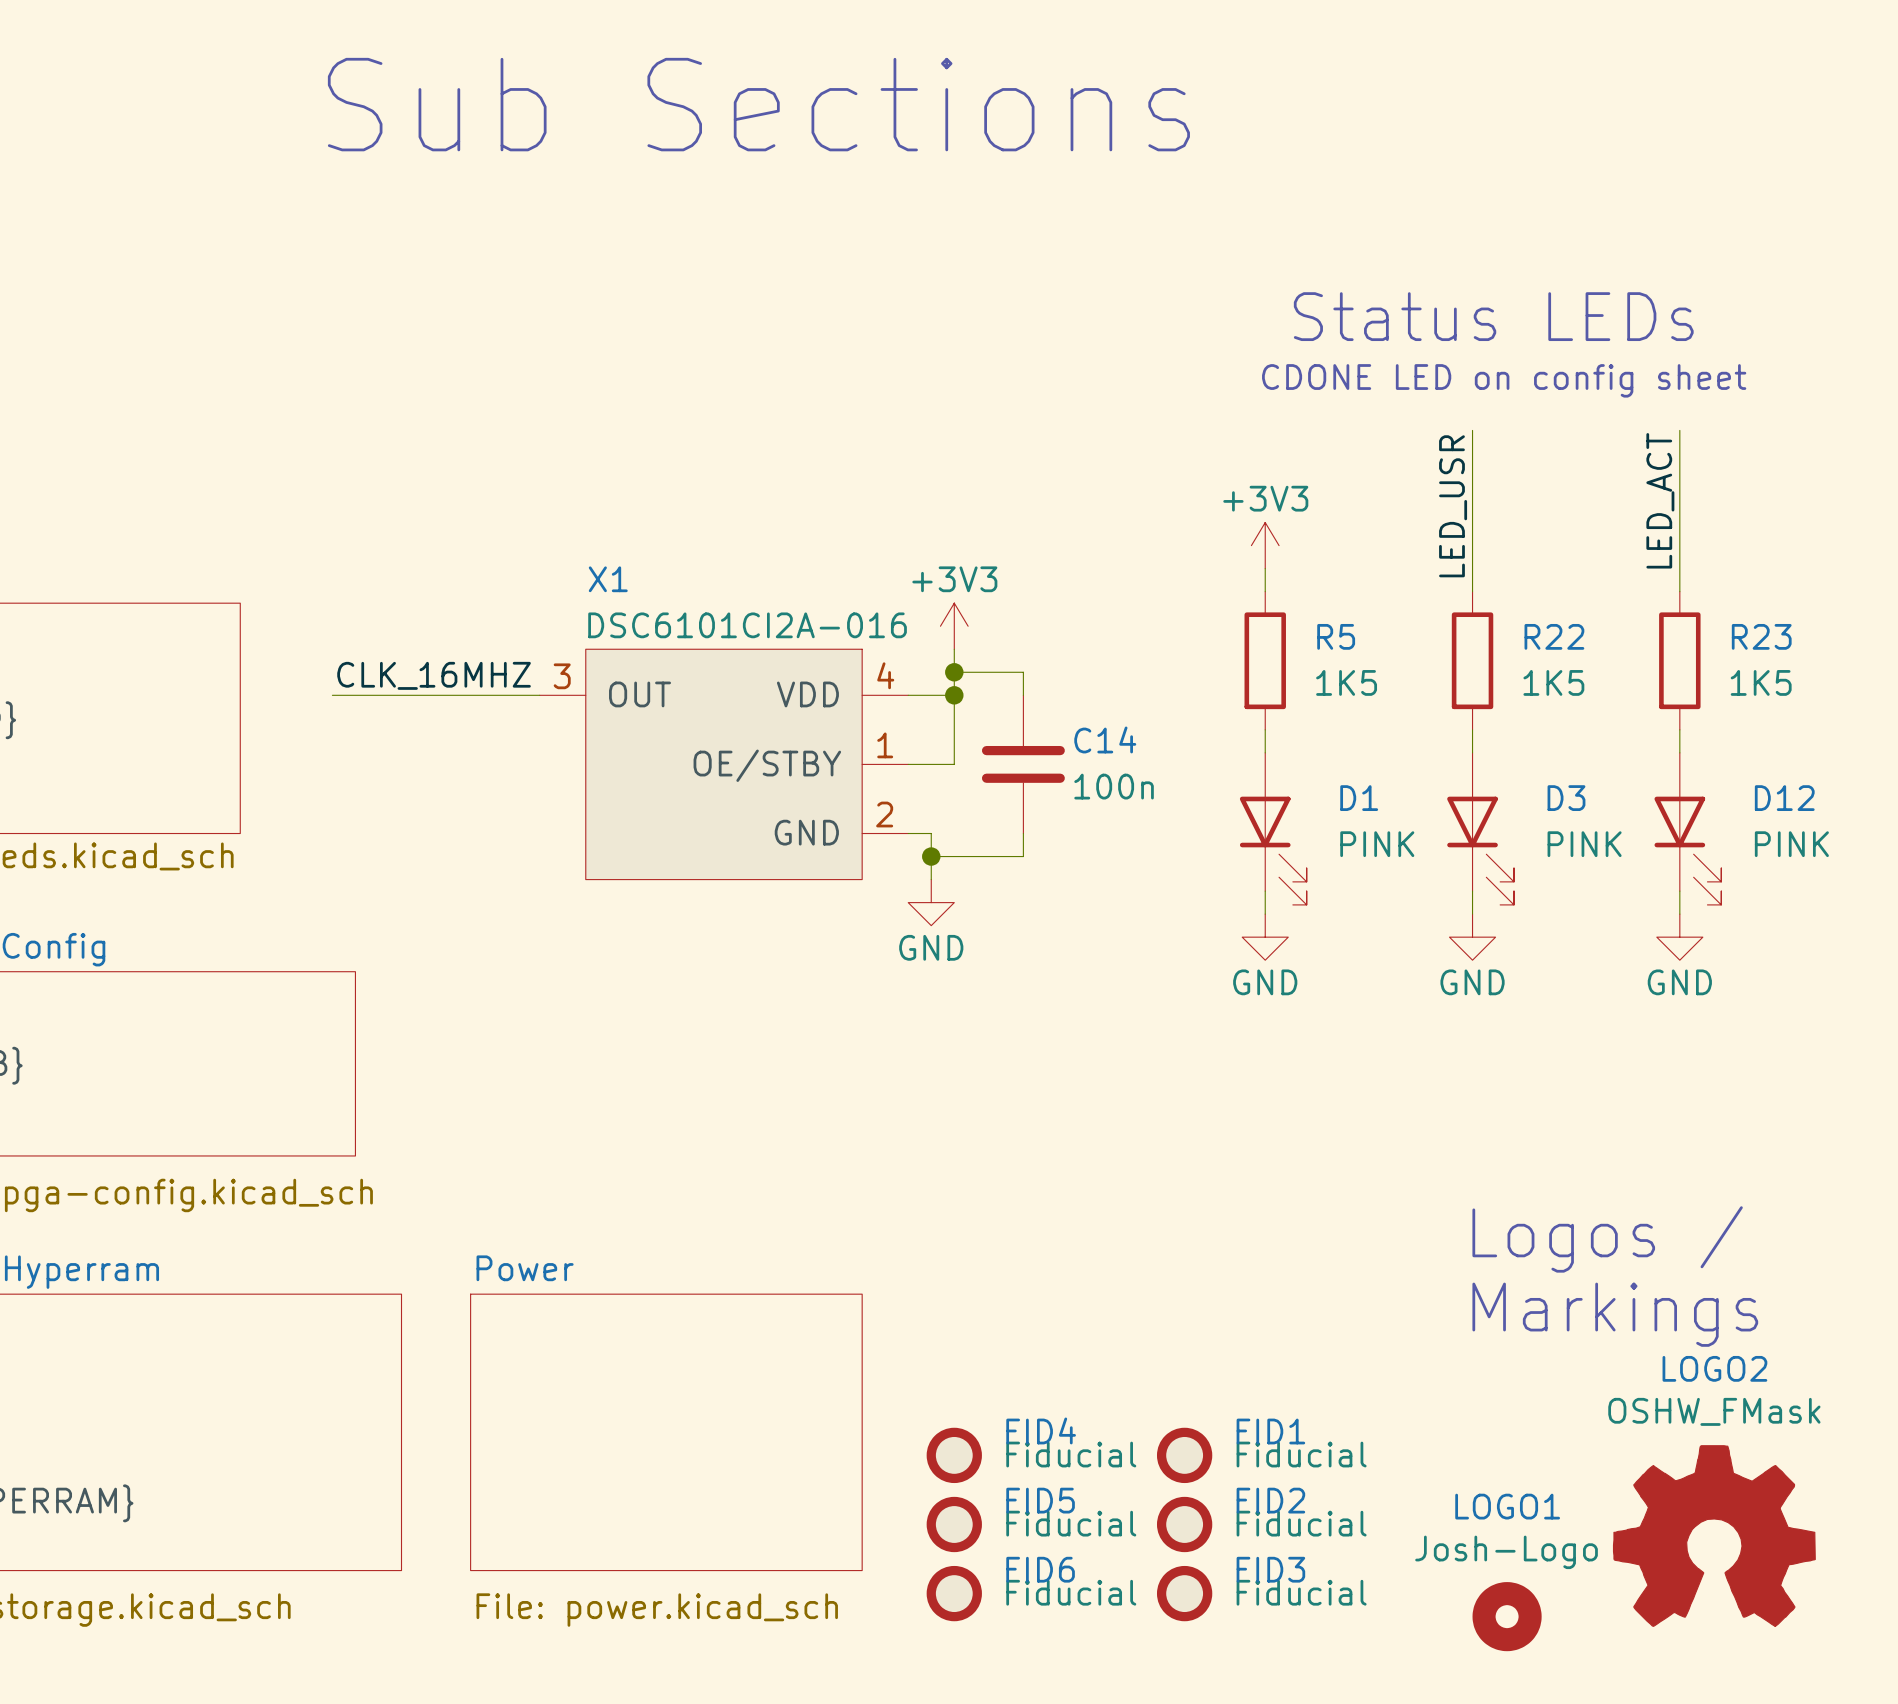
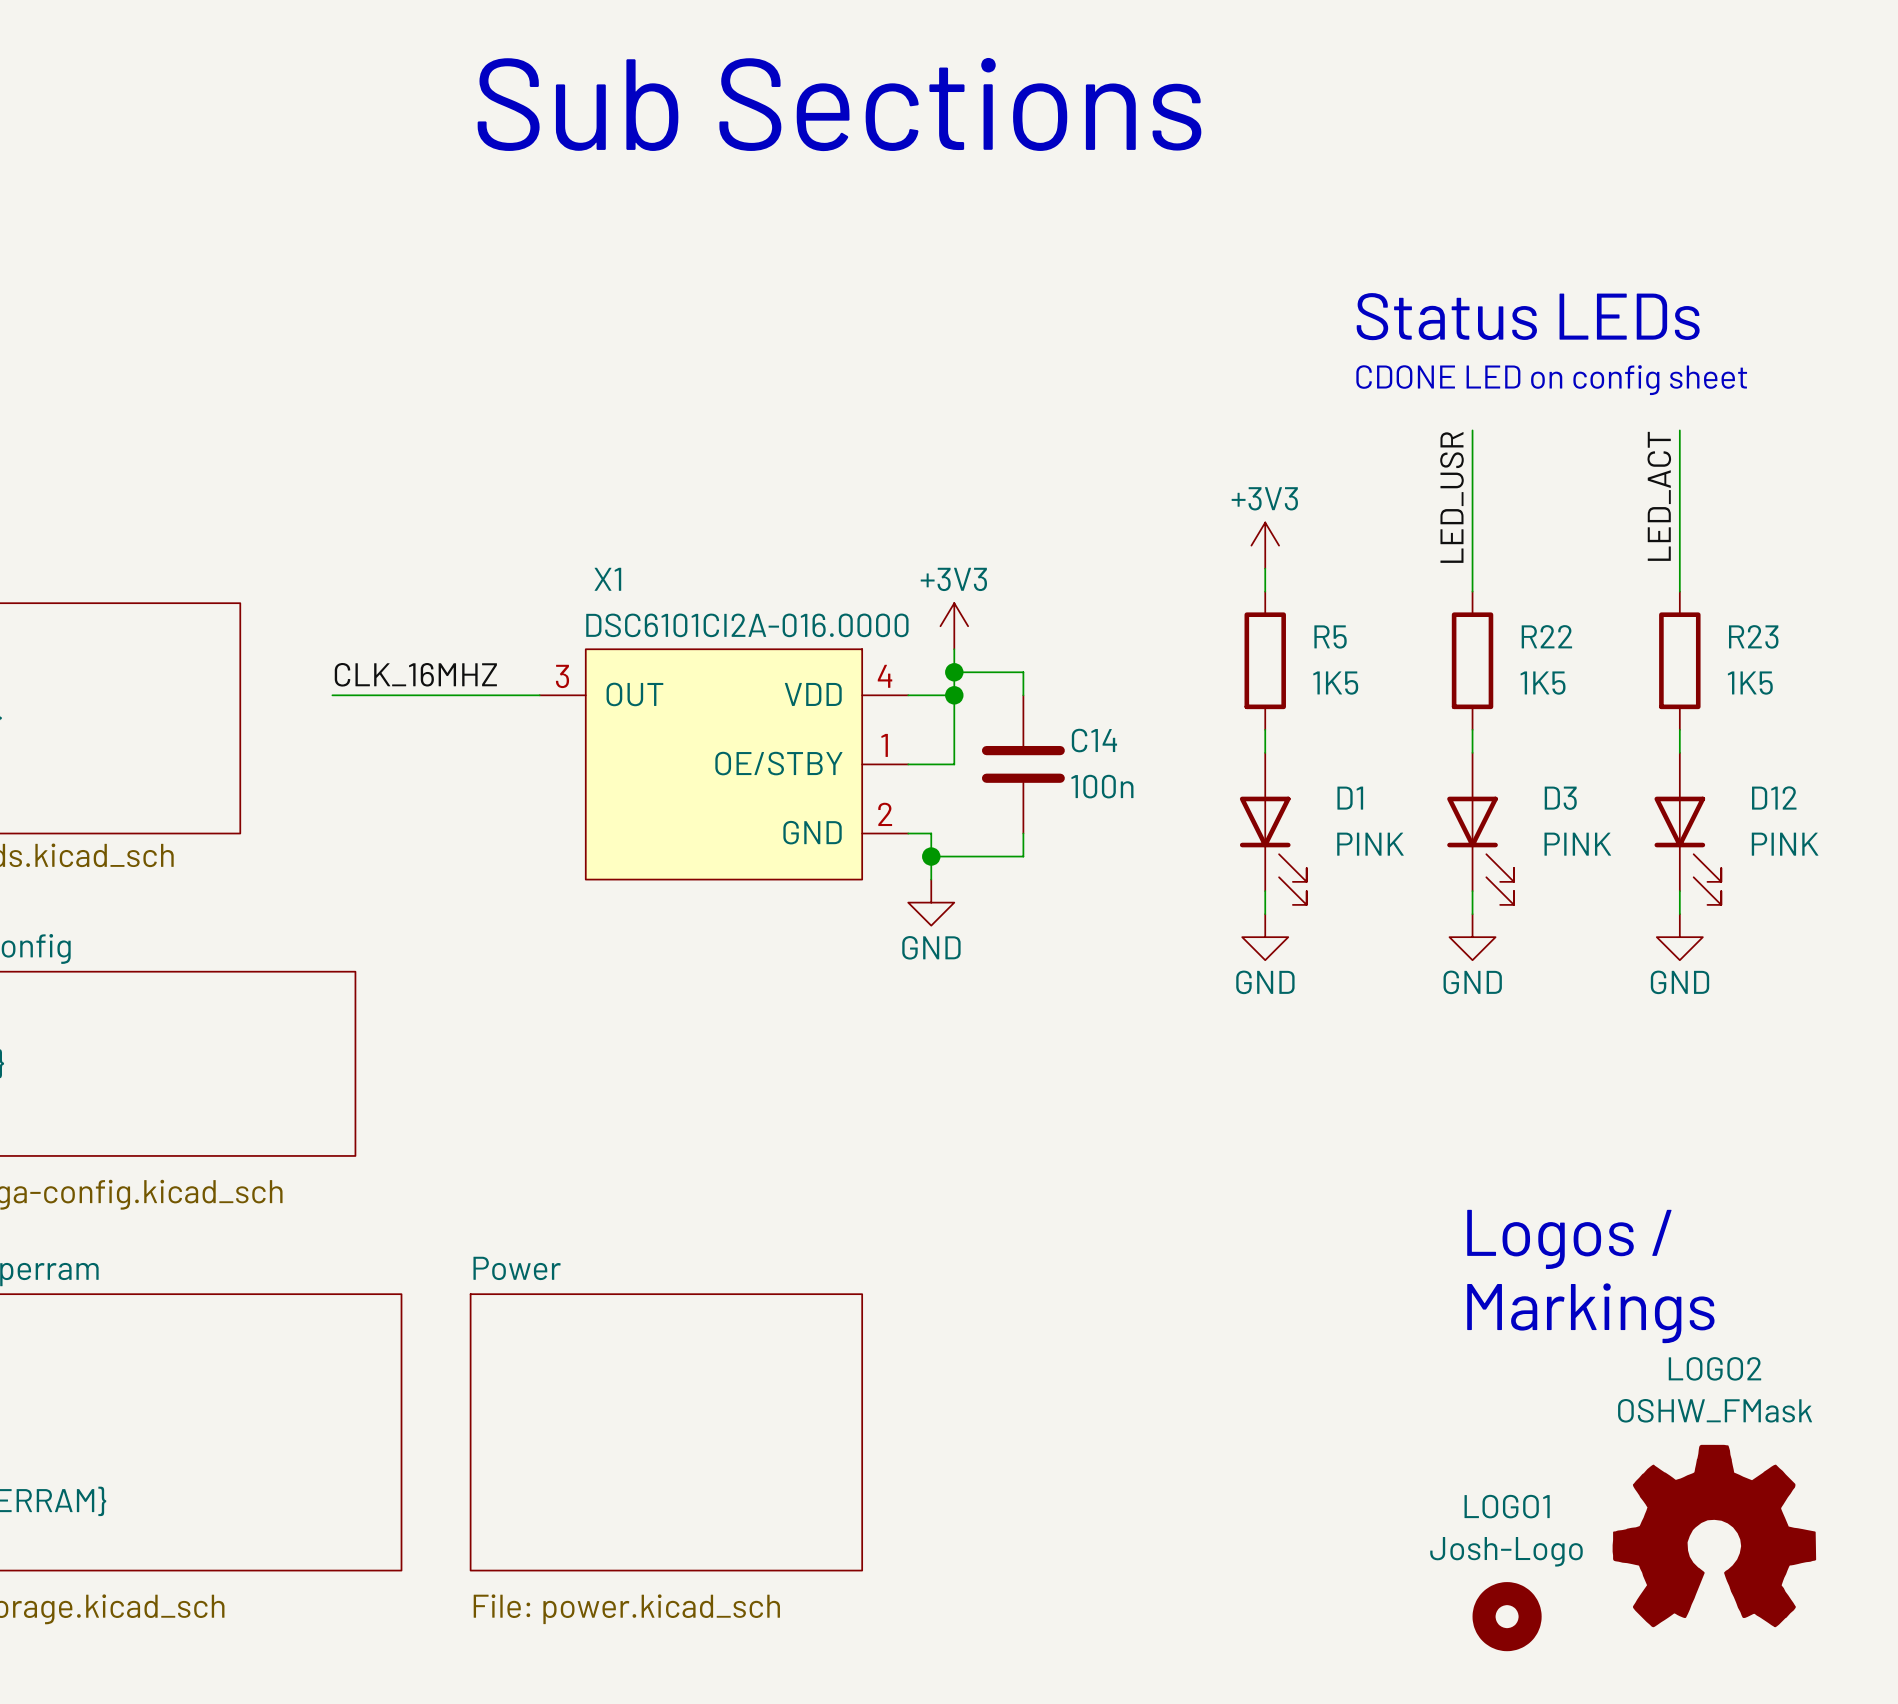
X1 value: DSC6101CI2A-016 (747, 625) -> DSC6101CI2A-016.0000 (747, 625)
FID4: Fiducial (954, 1455) -> none
FID1: Fiducial (1184, 1455) -> none
FID5: Fiducial (954, 1524) -> none
FID2: Fiducial (1184, 1524) -> none
FID6: Fiducial (954, 1593) -> none
FID3: Fiducial (1184, 1593) -> none

